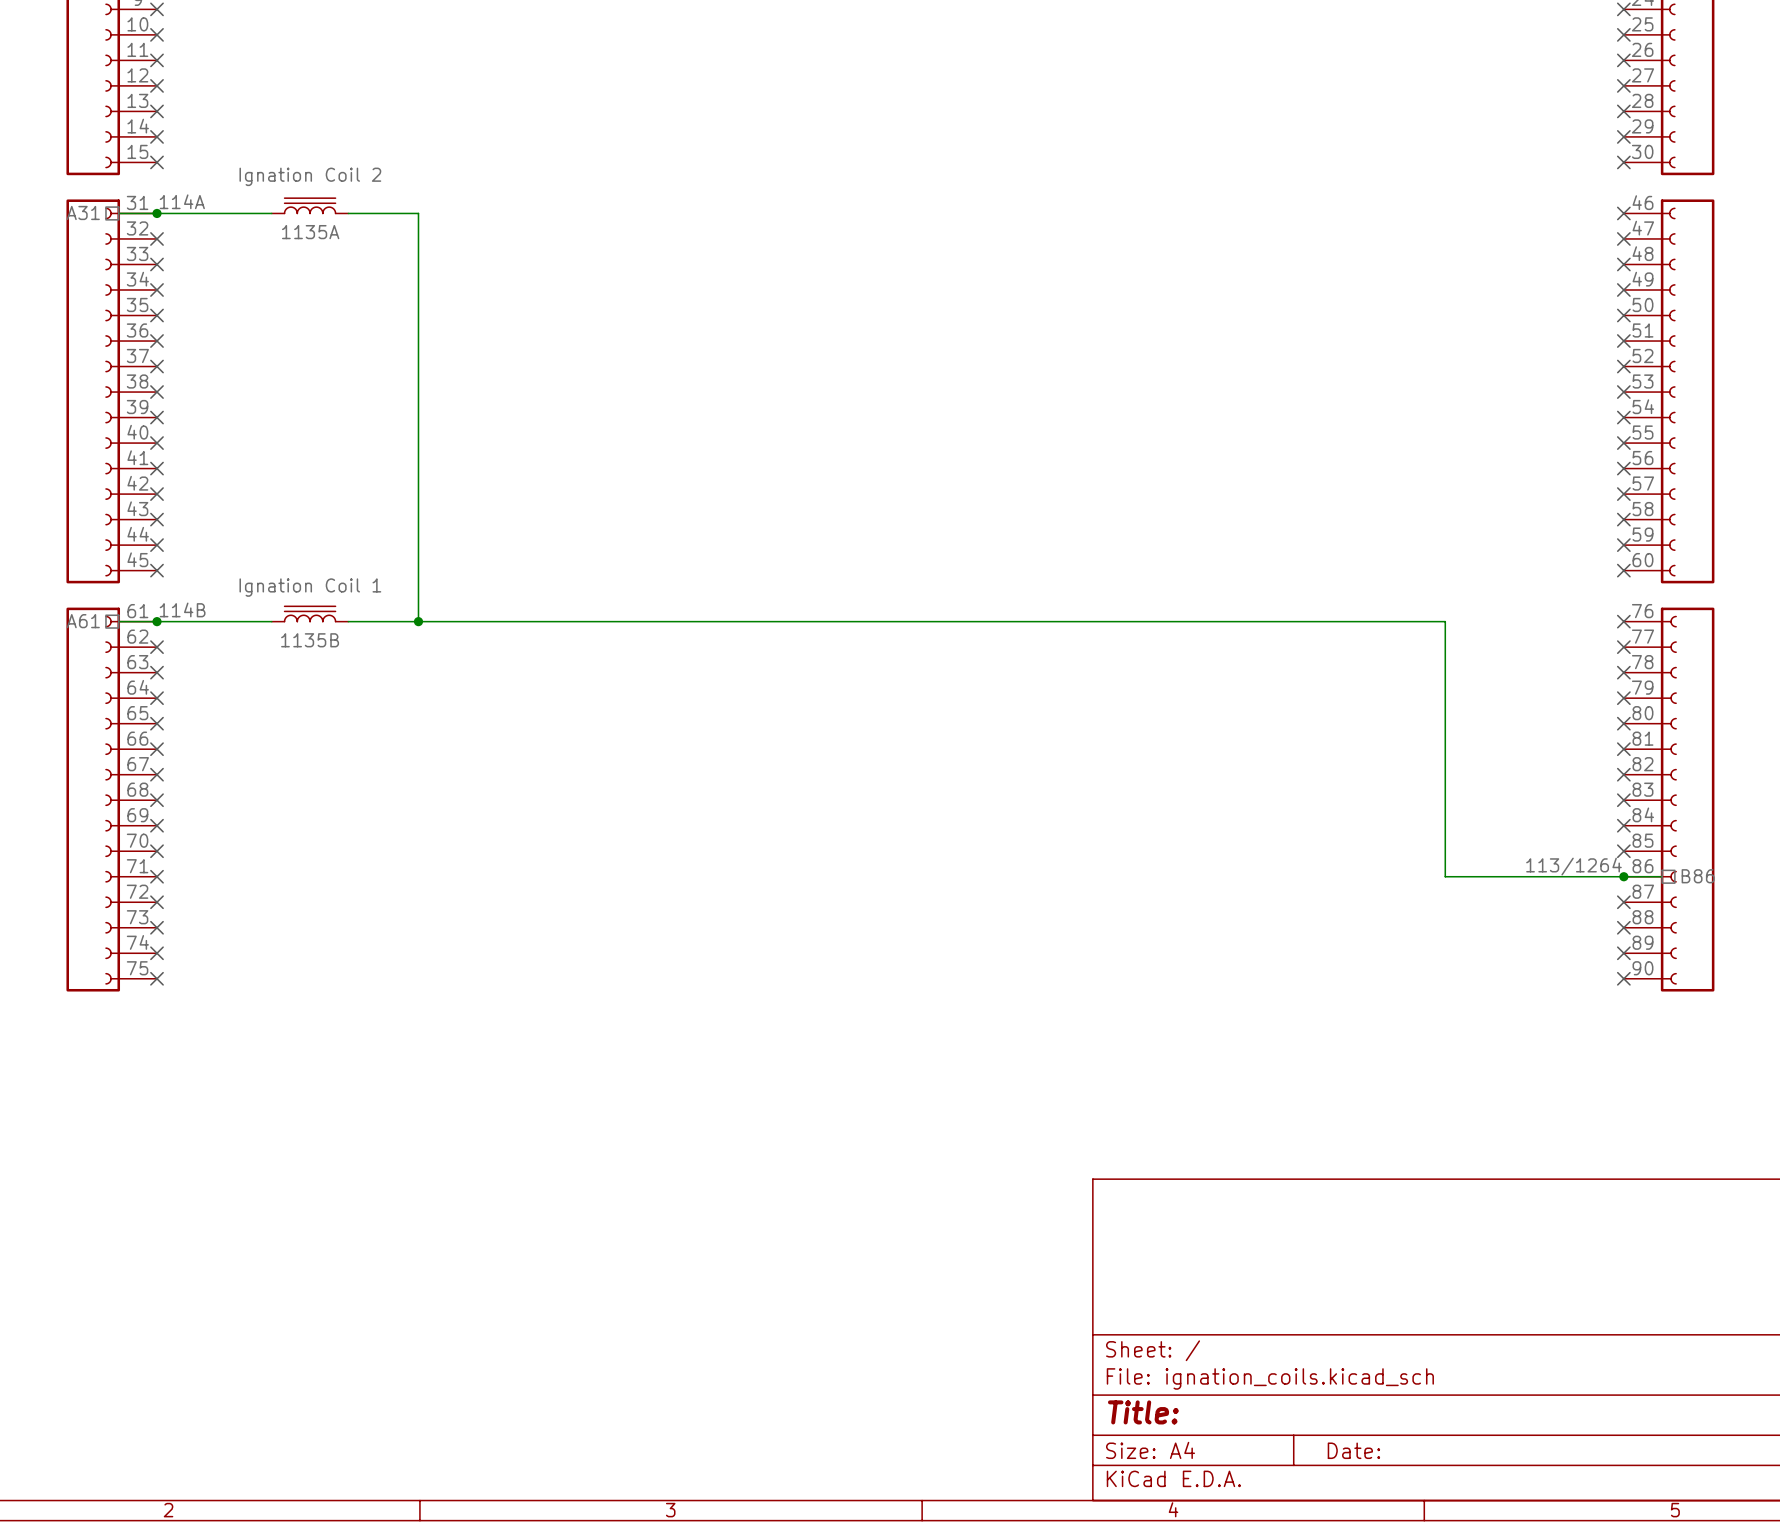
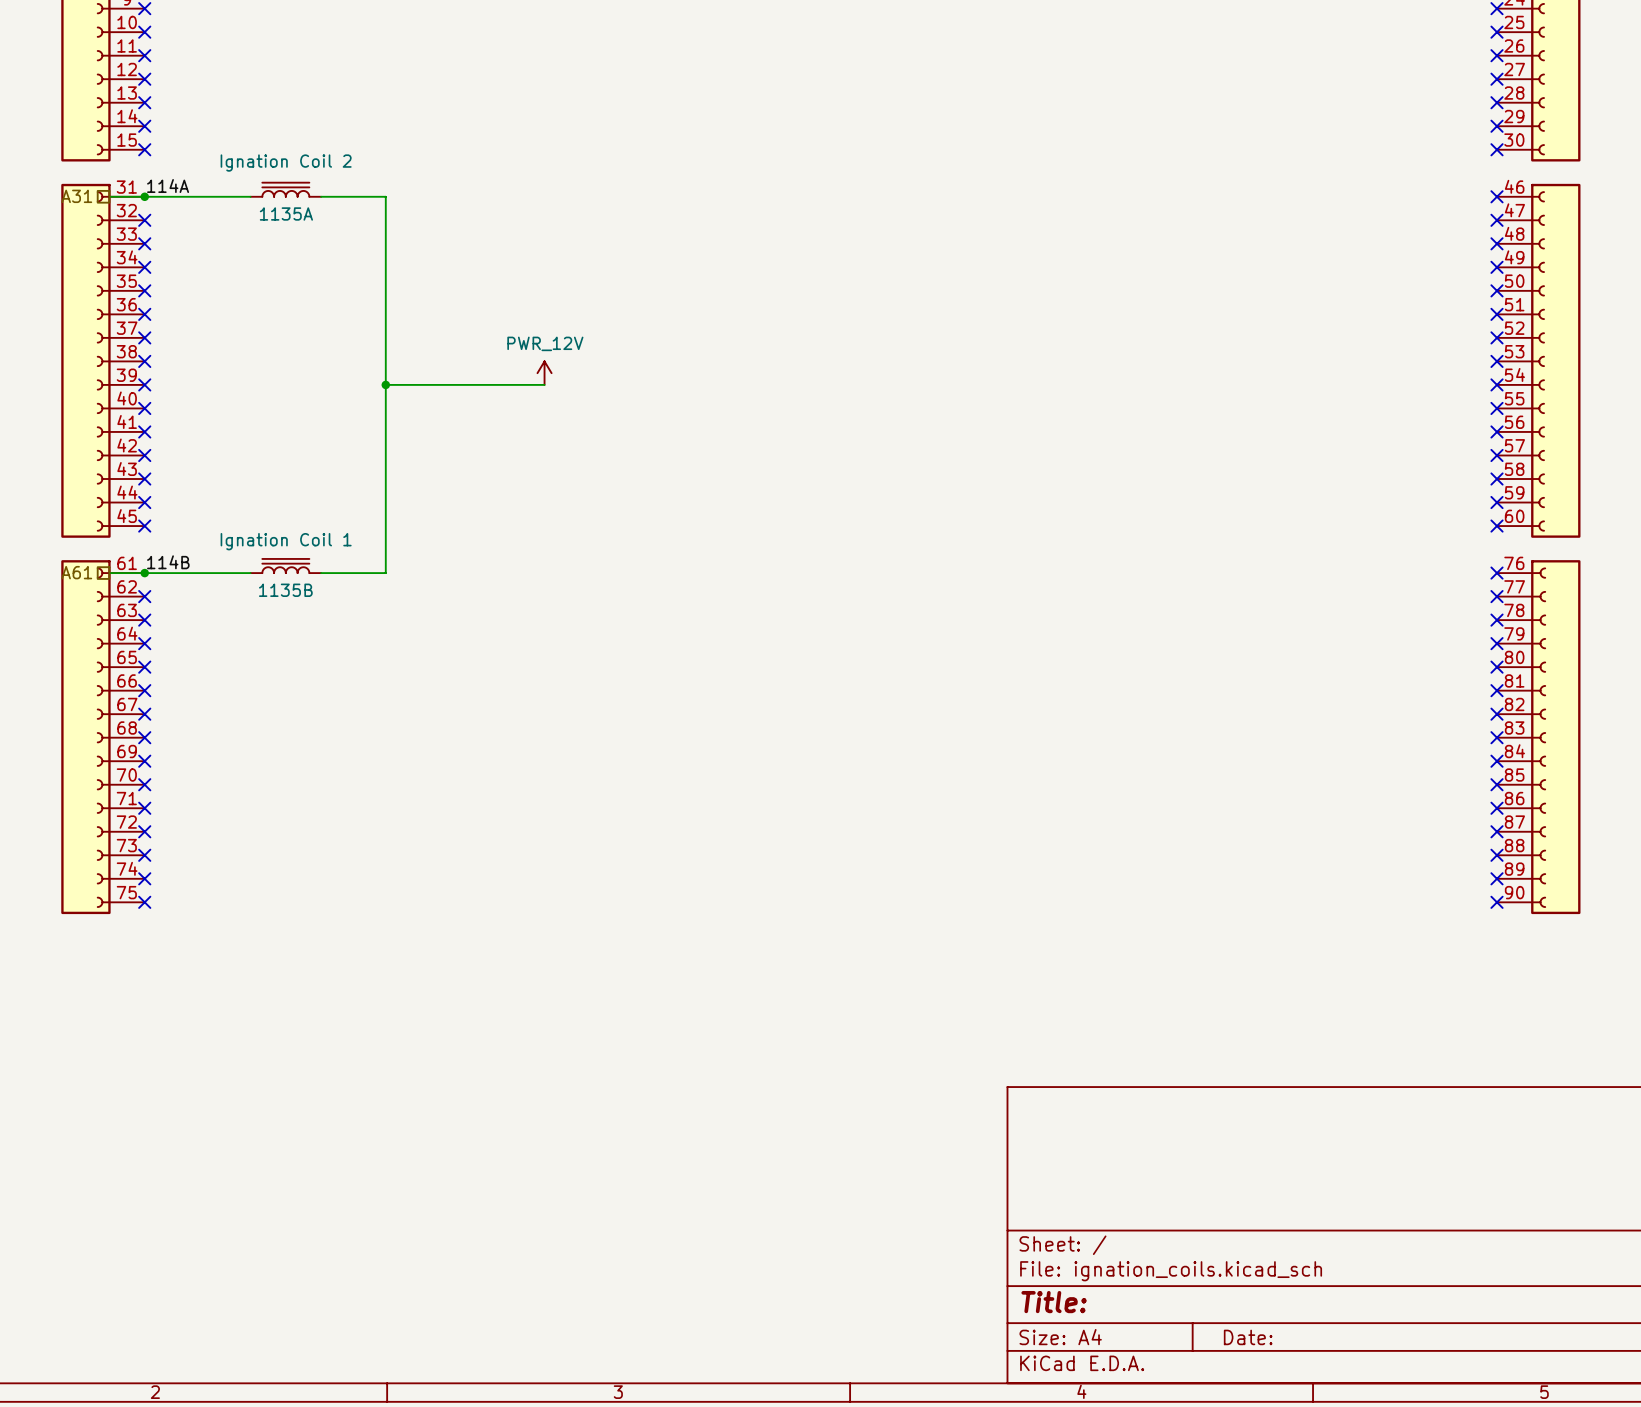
power symbol: none -> PWR_12V (544, 373)
wire: none -> (385, 384) (544, 384)
junction: none -> (385, 384)
wire: (418, 621) (1445, 621) (1445, 876) (1662, 876) -> none
junction: (418, 621) -> none
label: 113/1264 (1573, 866) -> none
junction: (1623, 876) -> none
no-connect mark: none -> (1497, 808)
hierarchical label: B86 (1698, 876) -> none

